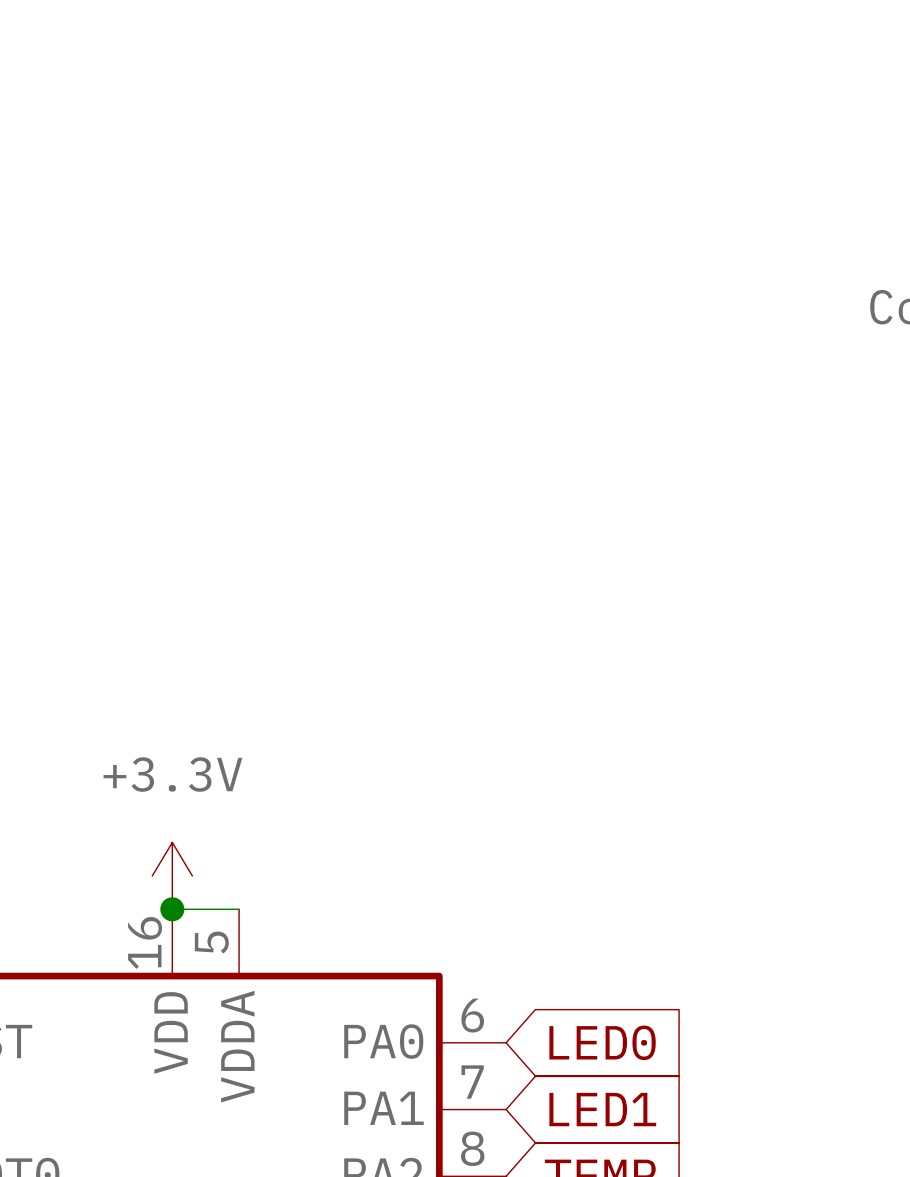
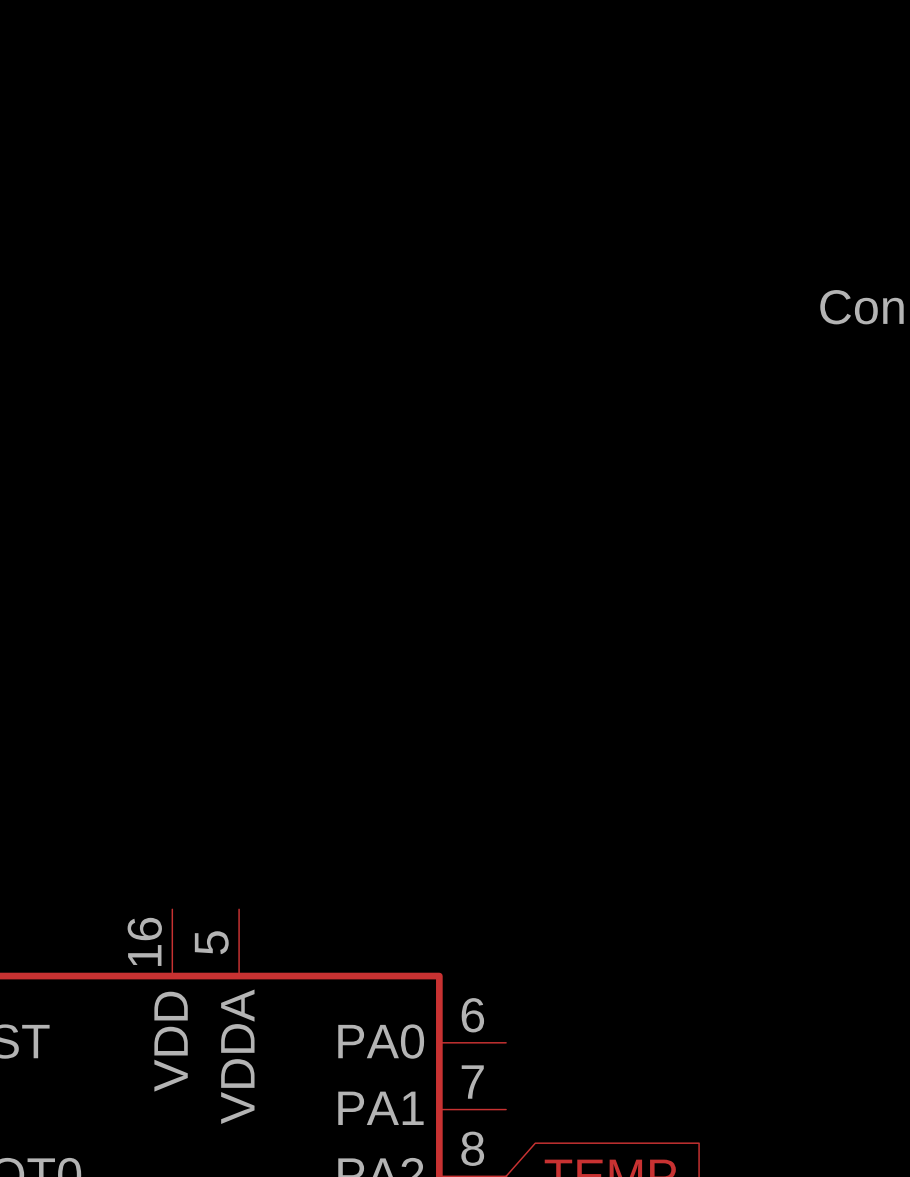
power symbol: +3.3V (172, 875) -> none
wire: (172, 909) (239, 909) -> none
junction: (172, 909) -> none
global label: LED0 (602, 1042) -> none
global label: LED1 (602, 1109) -> none

